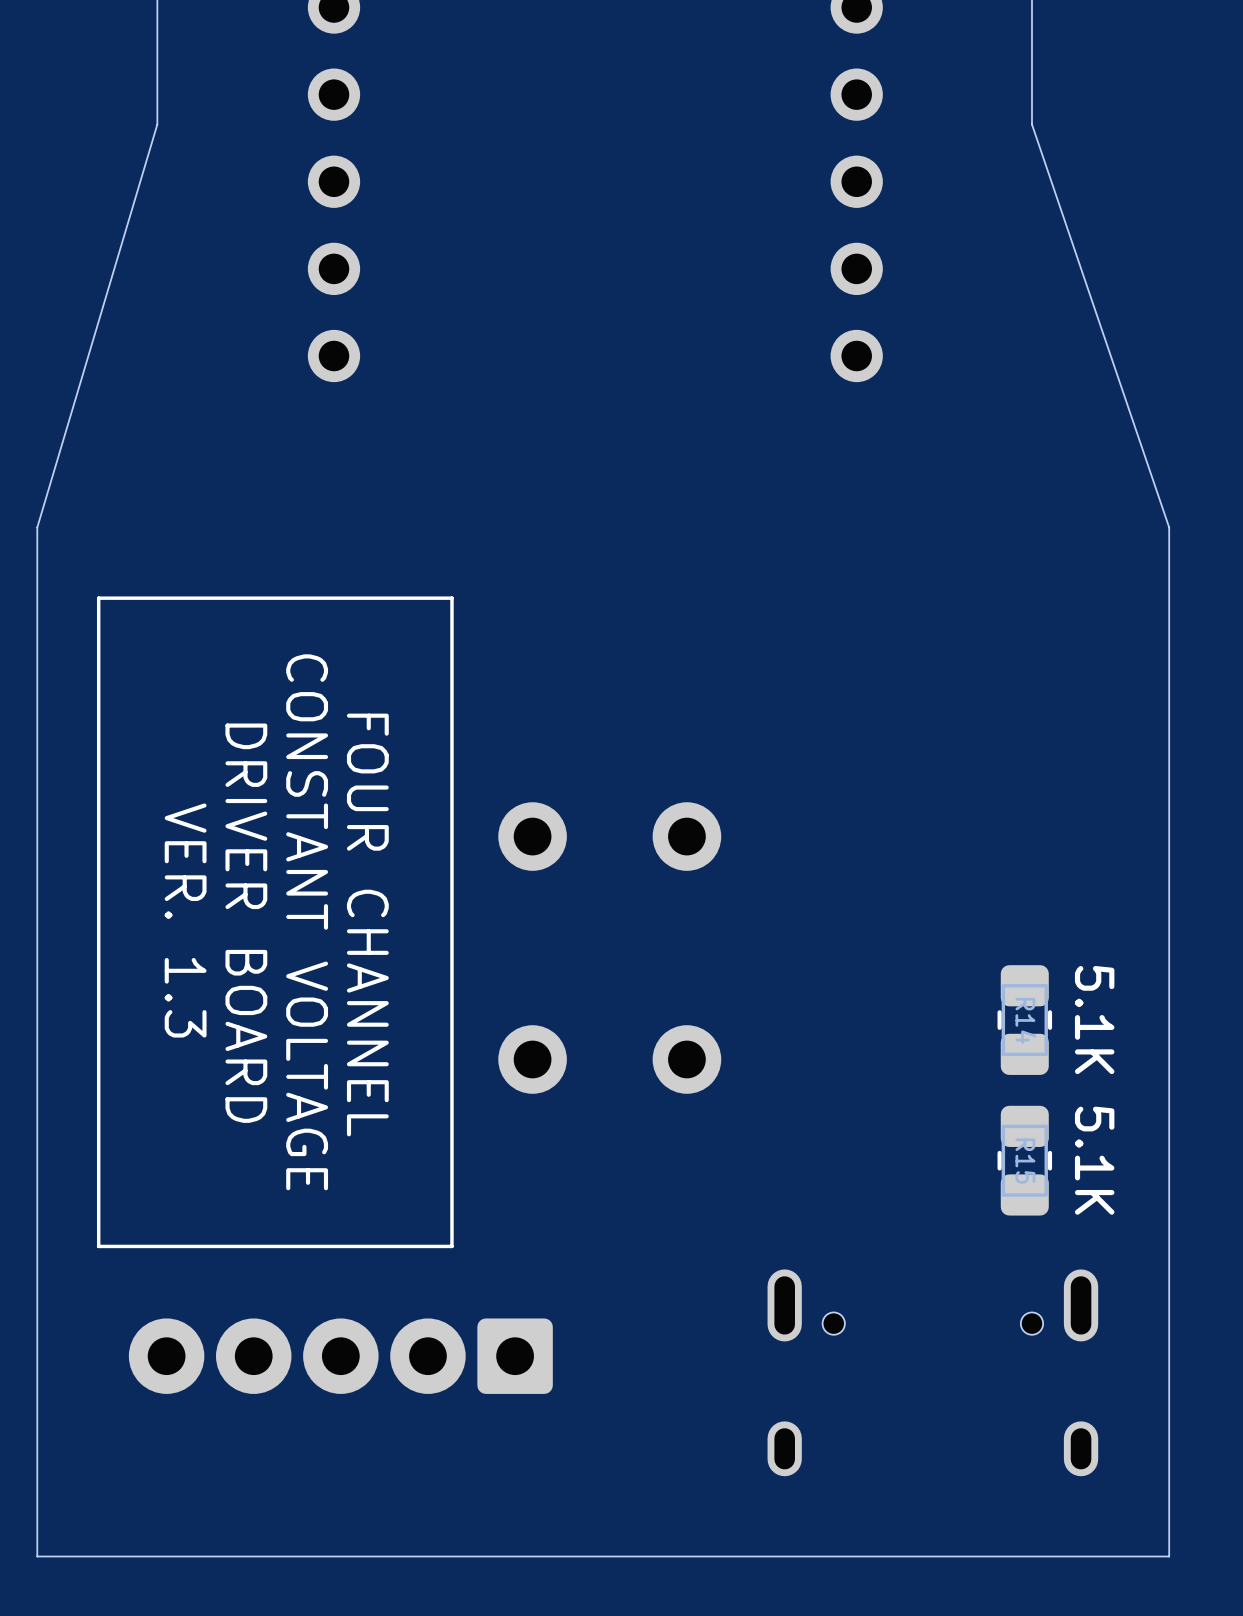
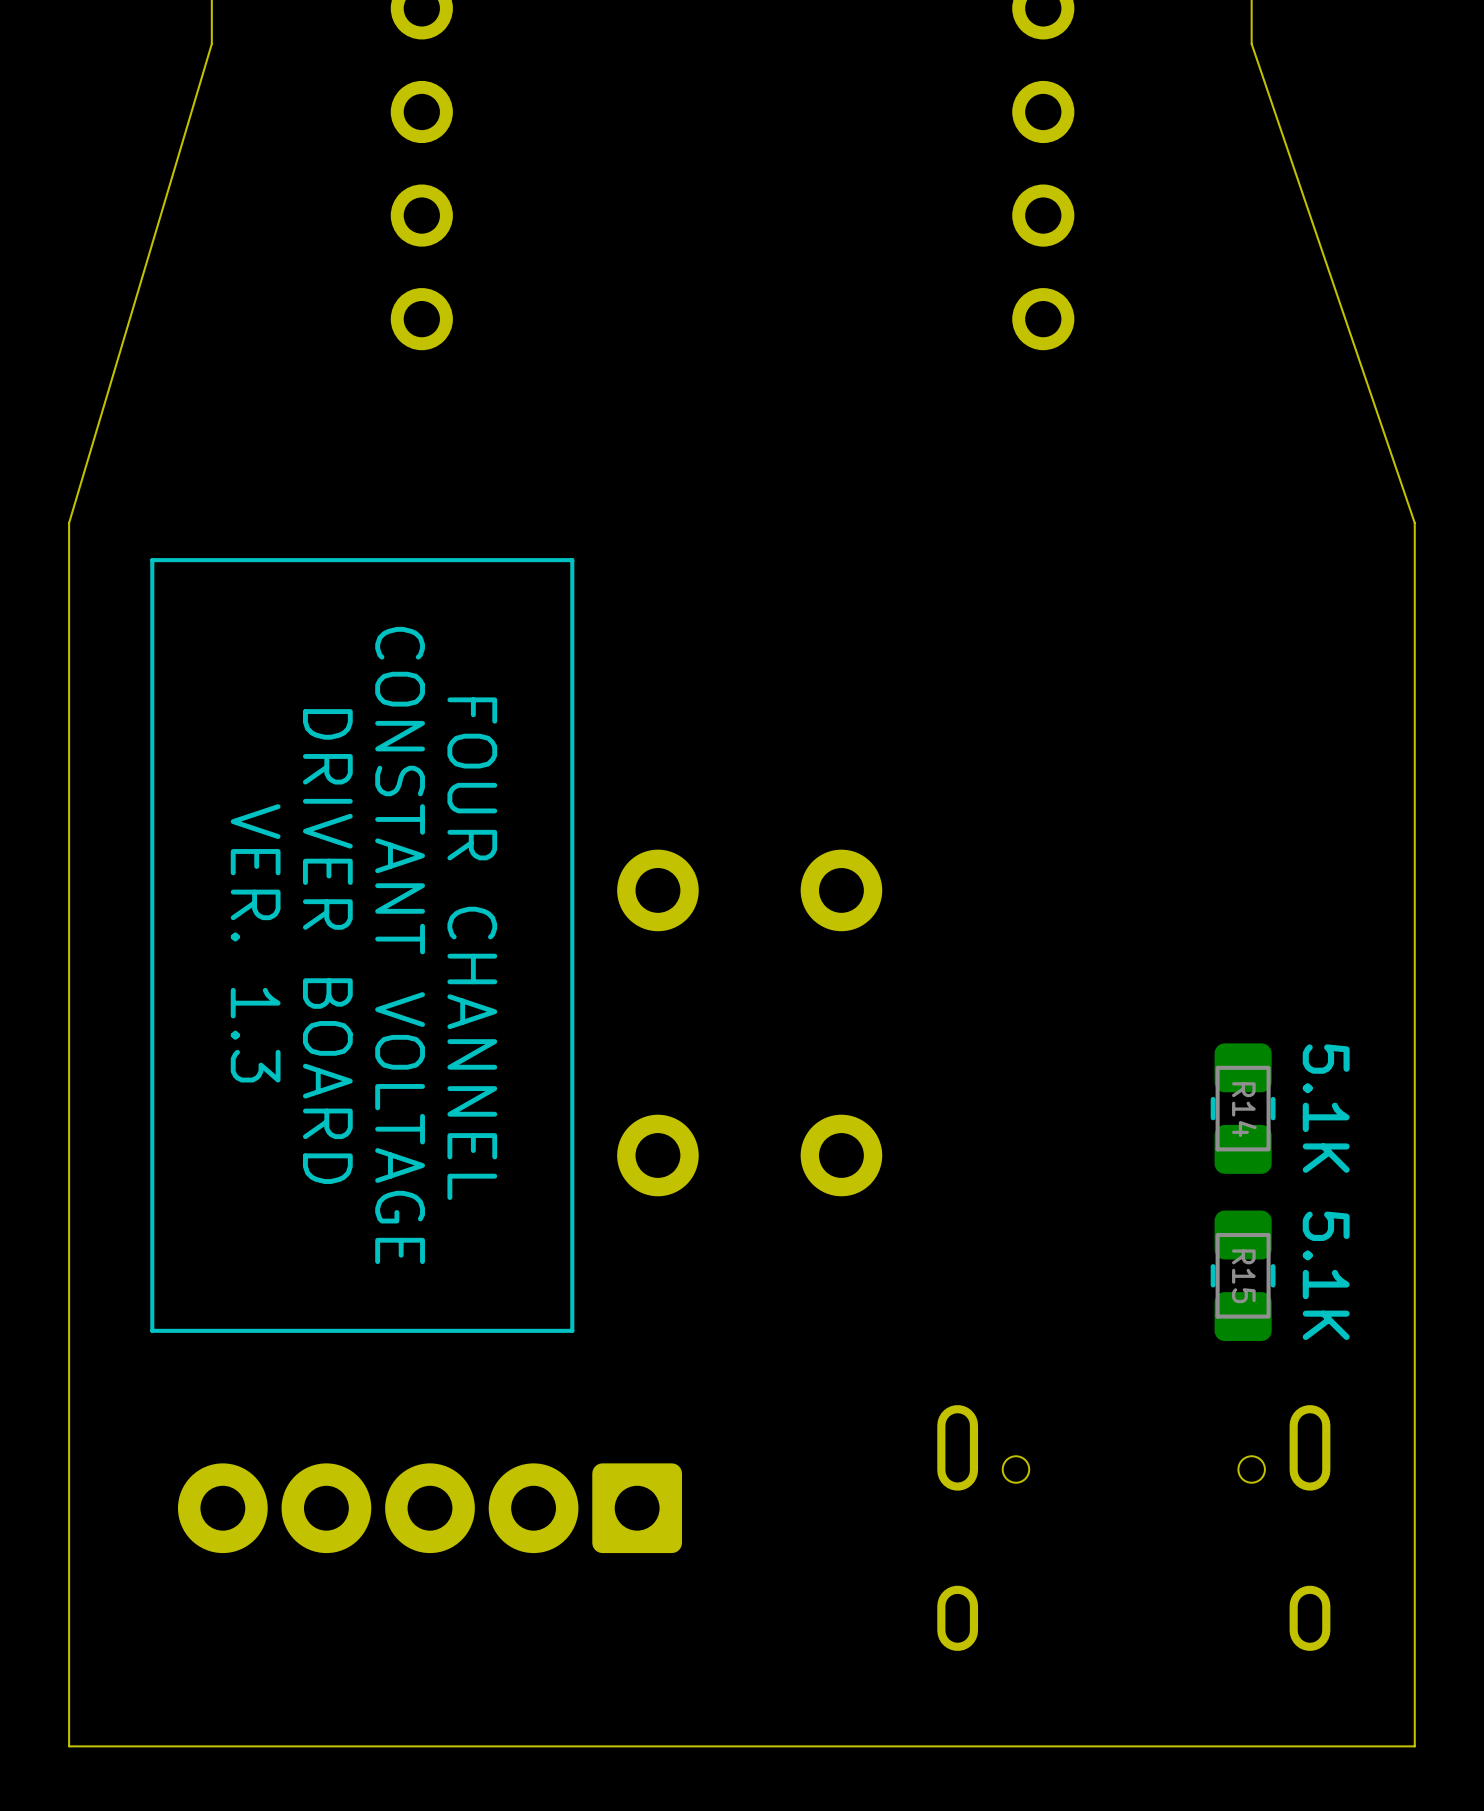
line: (451, 598) (98, 598) (98, 1246) (451, 1246) (451, 598) -> (572, 560) (152, 560) (152, 1330) (572, 1330) (572, 560)
text position: VER. 1.3 (185, 920) -> VER. 1.3 (255, 943)
text position: CONSTANT VOLTAGE (307, 922) -> CONSTANT VOLTAGE (400, 945)
text position: DRIVER BOARD (246, 923) -> DRIVER BOARD (327, 946)
text position: FOUR CHANNEL (367, 924) -> FOUR CHANNEL (472, 948)

